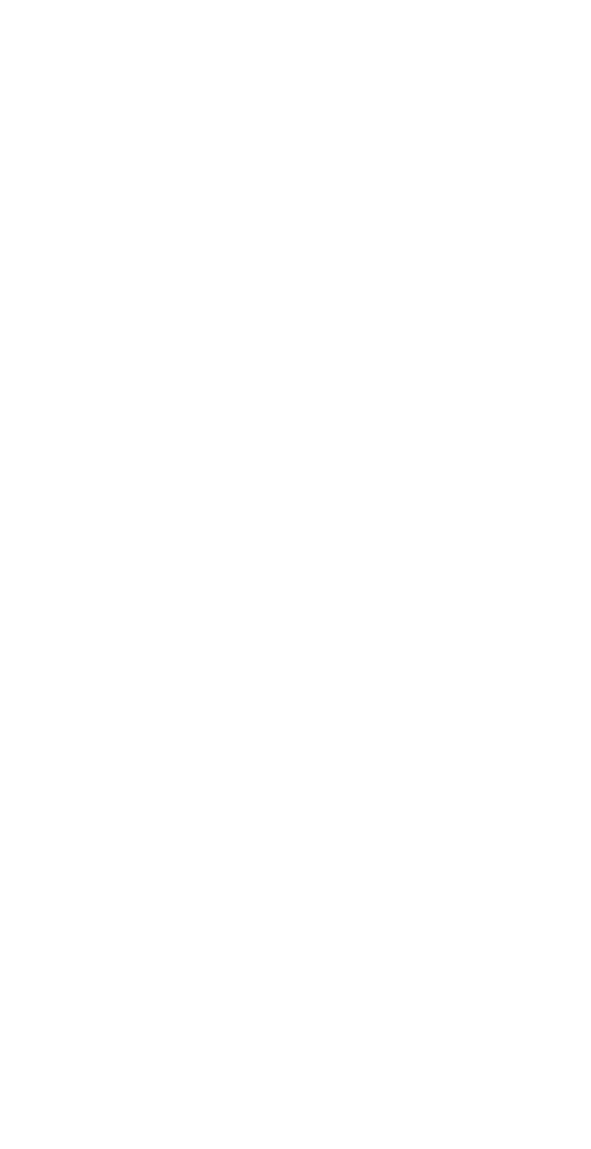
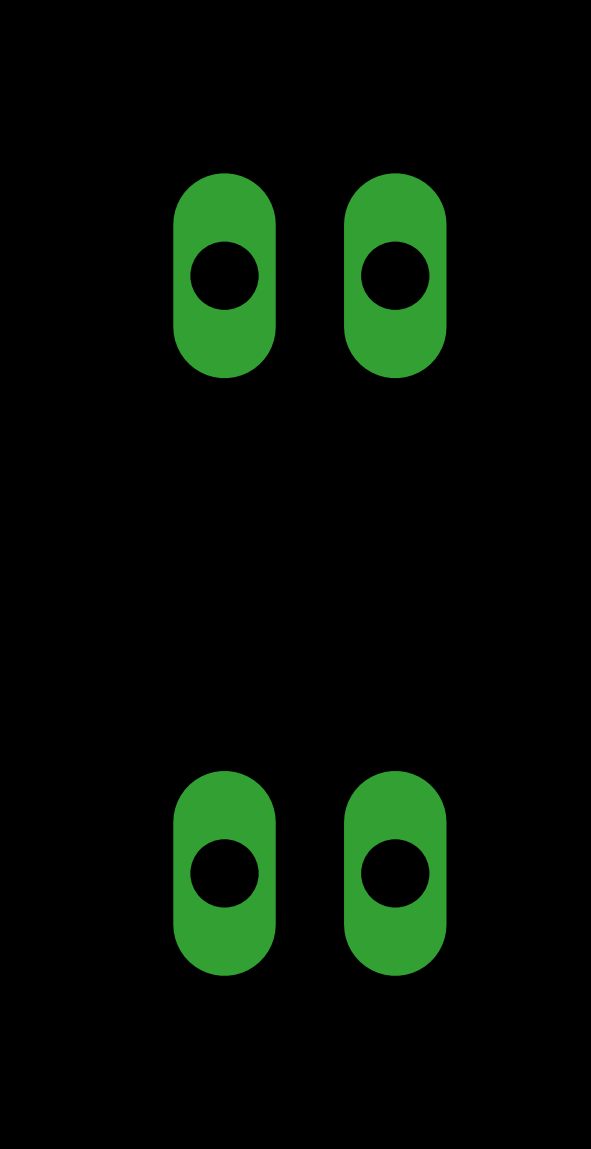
part: none -> (309, 275)
part: none -> (309, 873)

